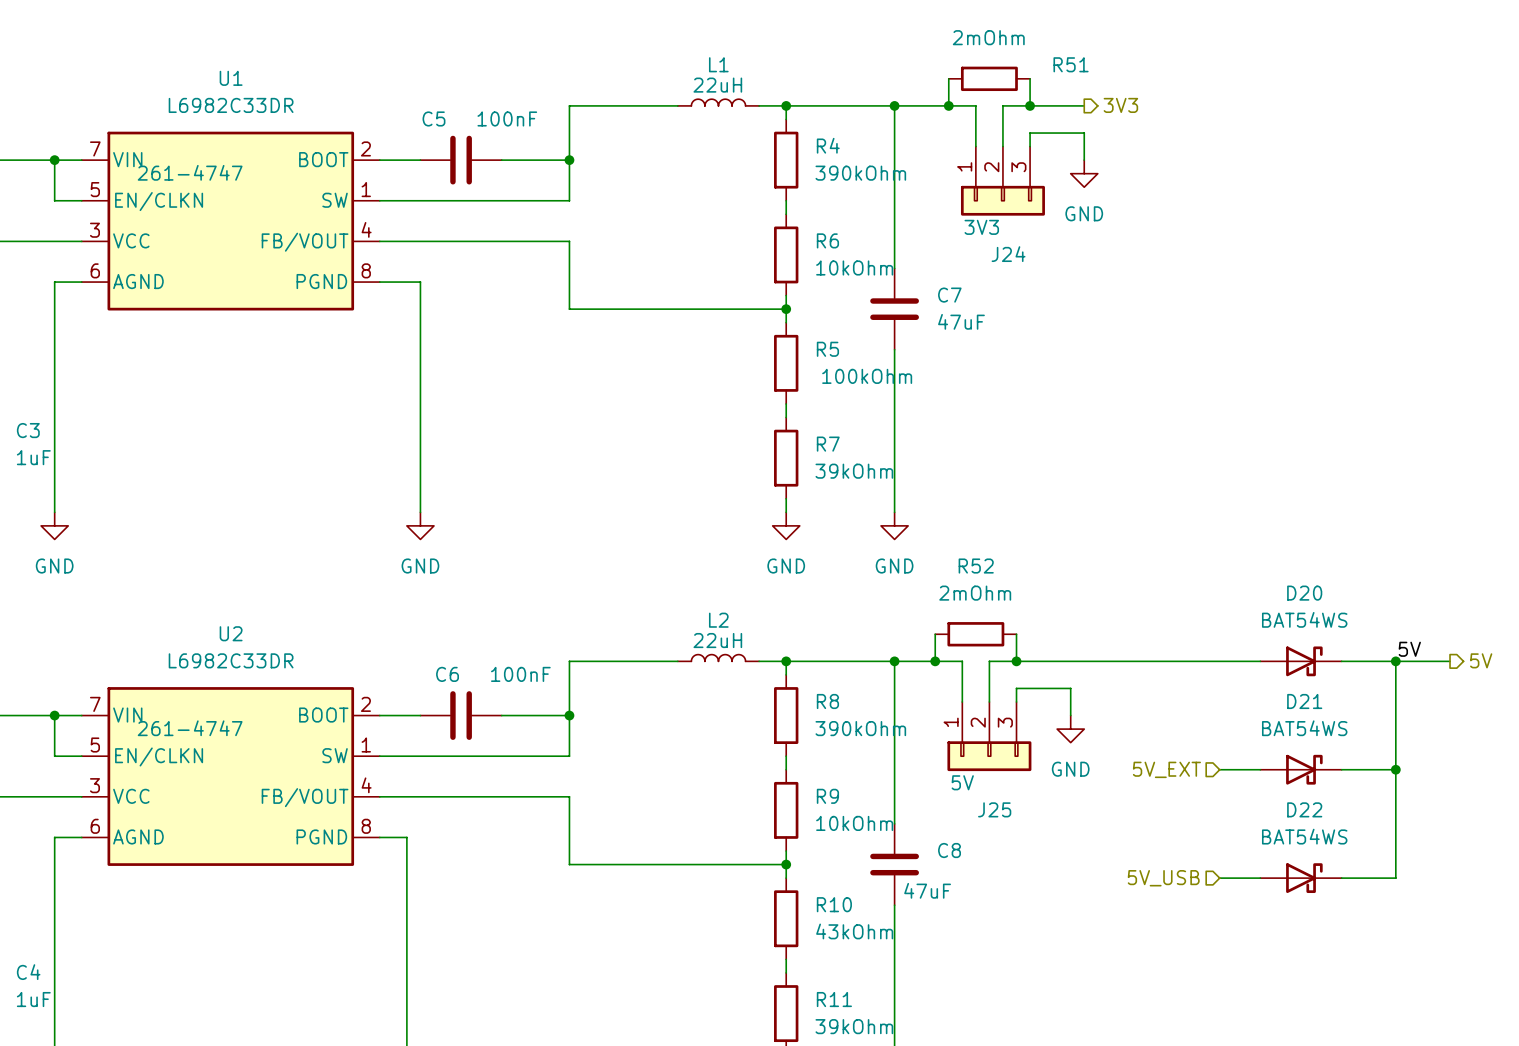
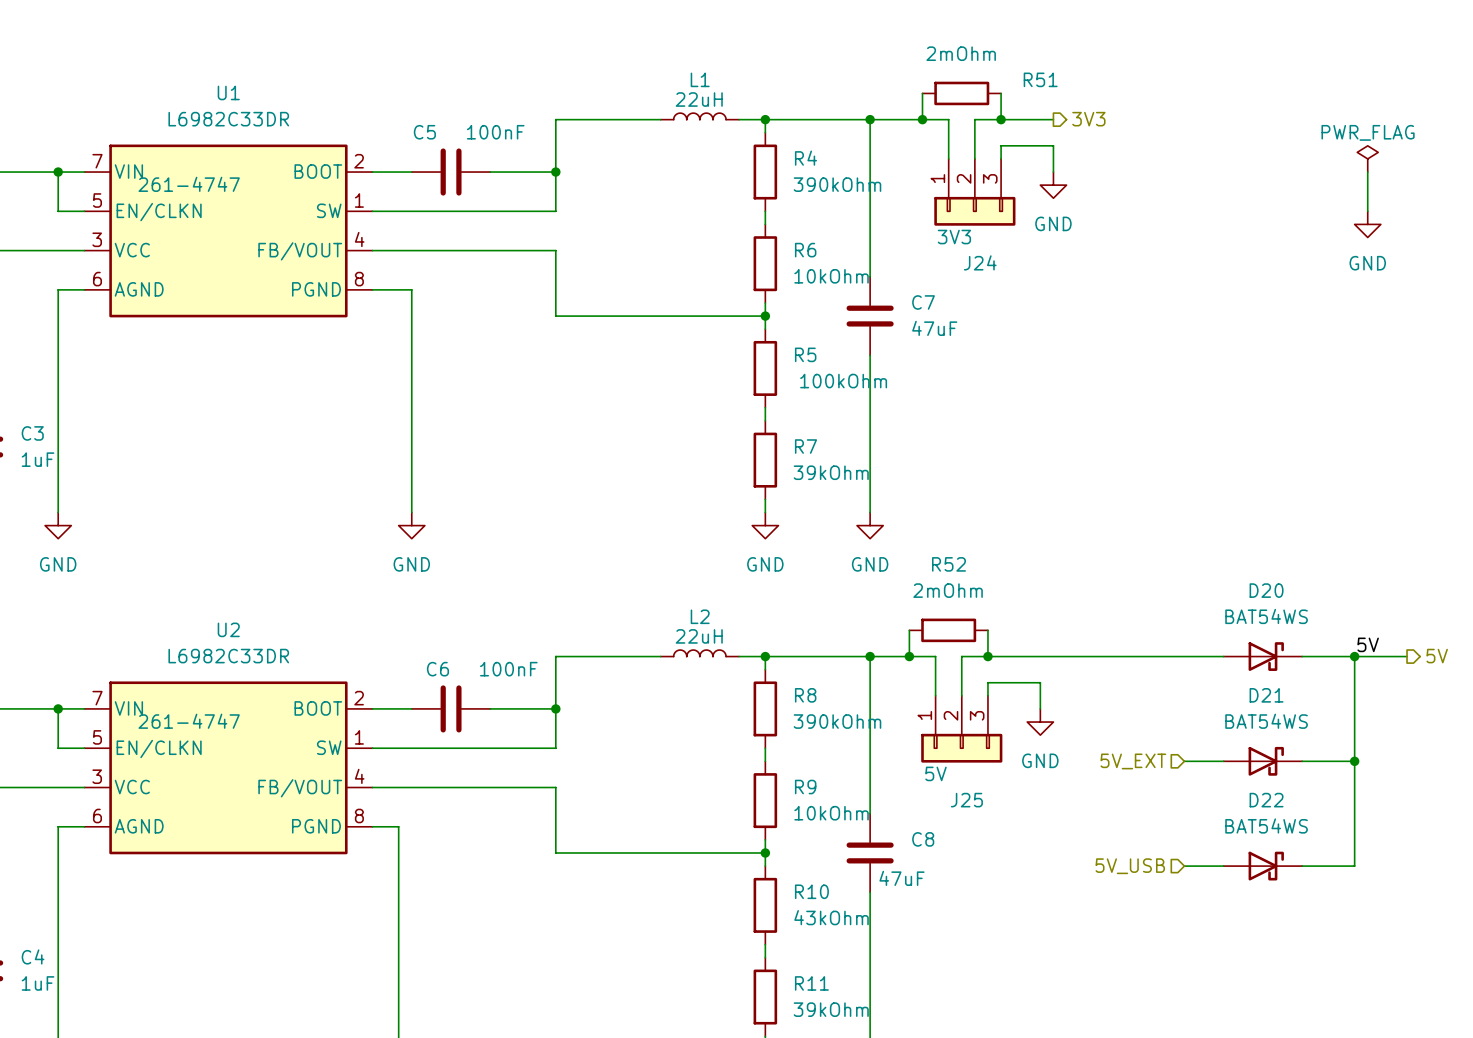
power symbol: none -> PWR_FLAG (1367, 158)
wire: none -> (1367, 172) (1367, 211)
power symbol: none -> GND (1367, 224)

